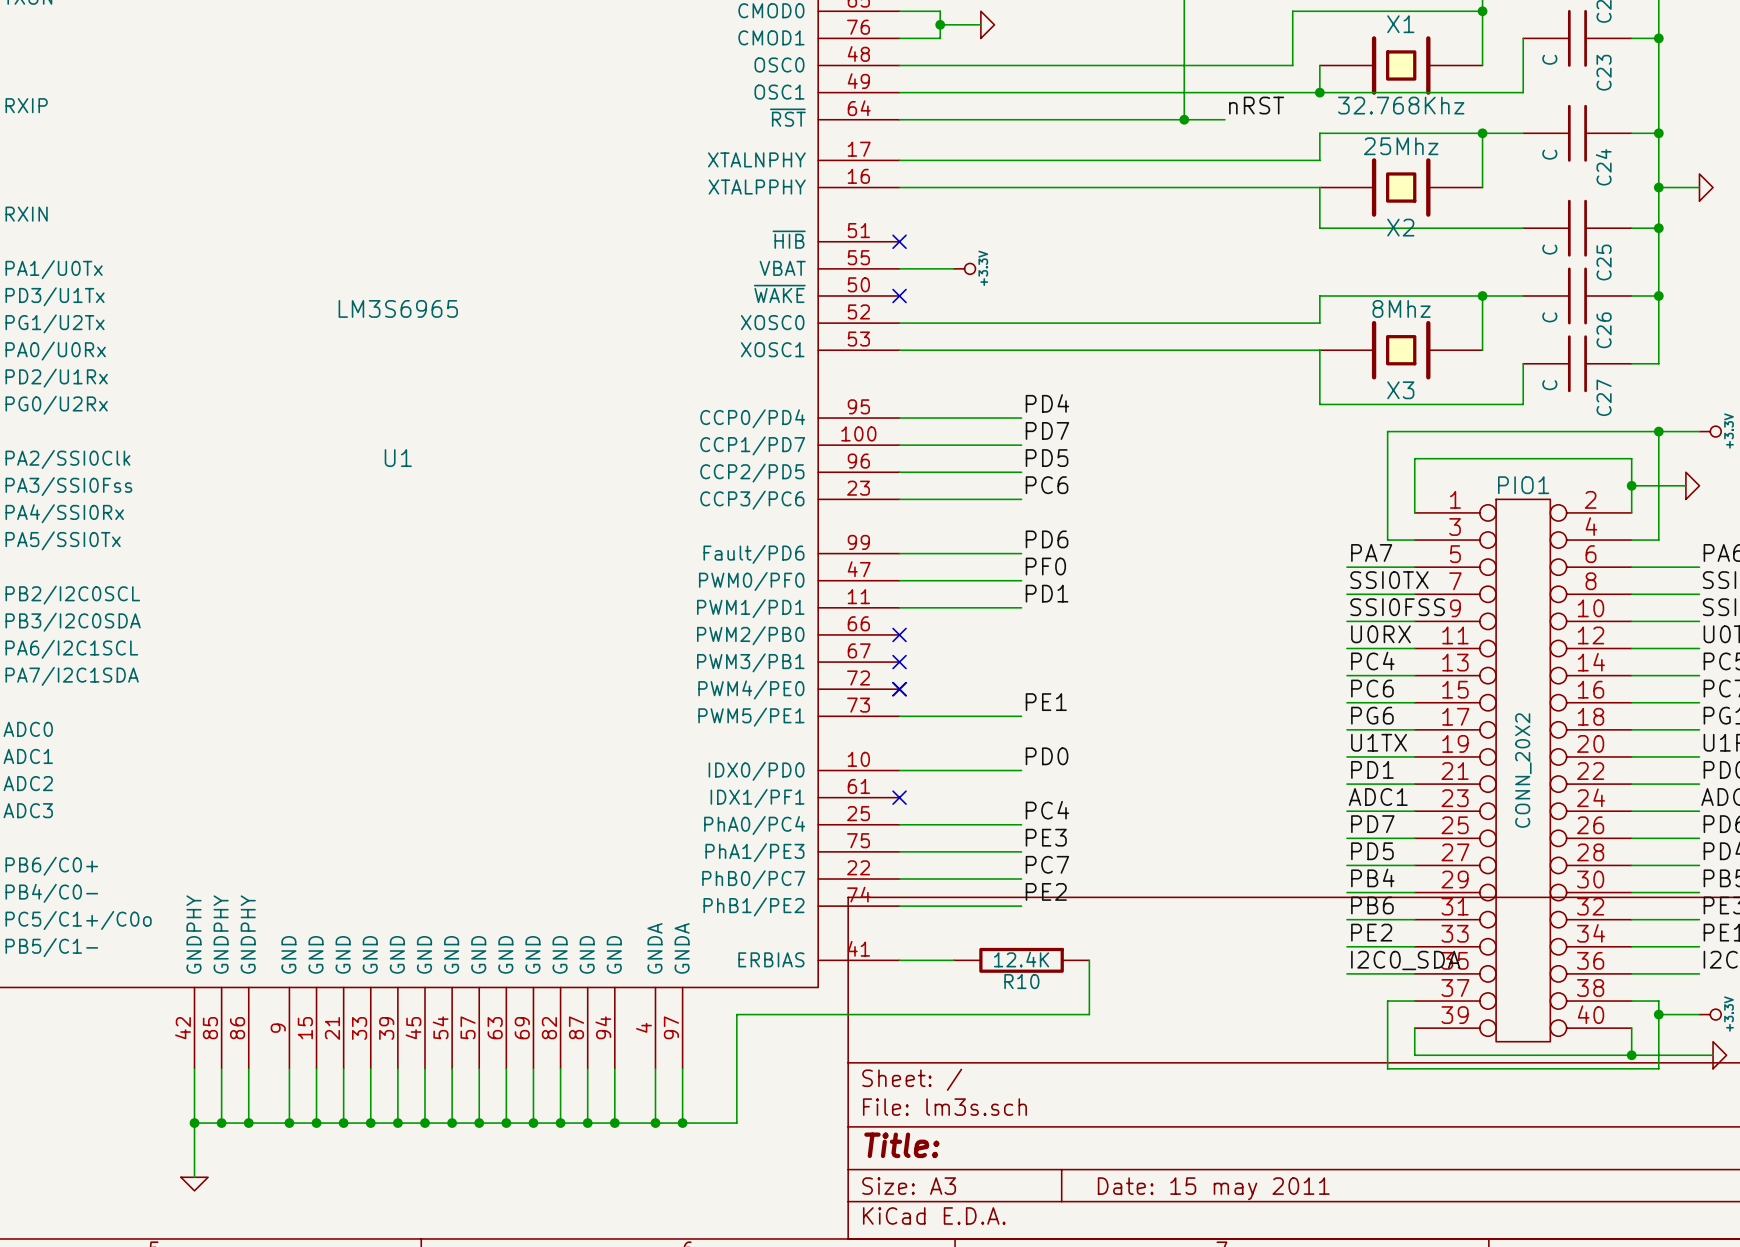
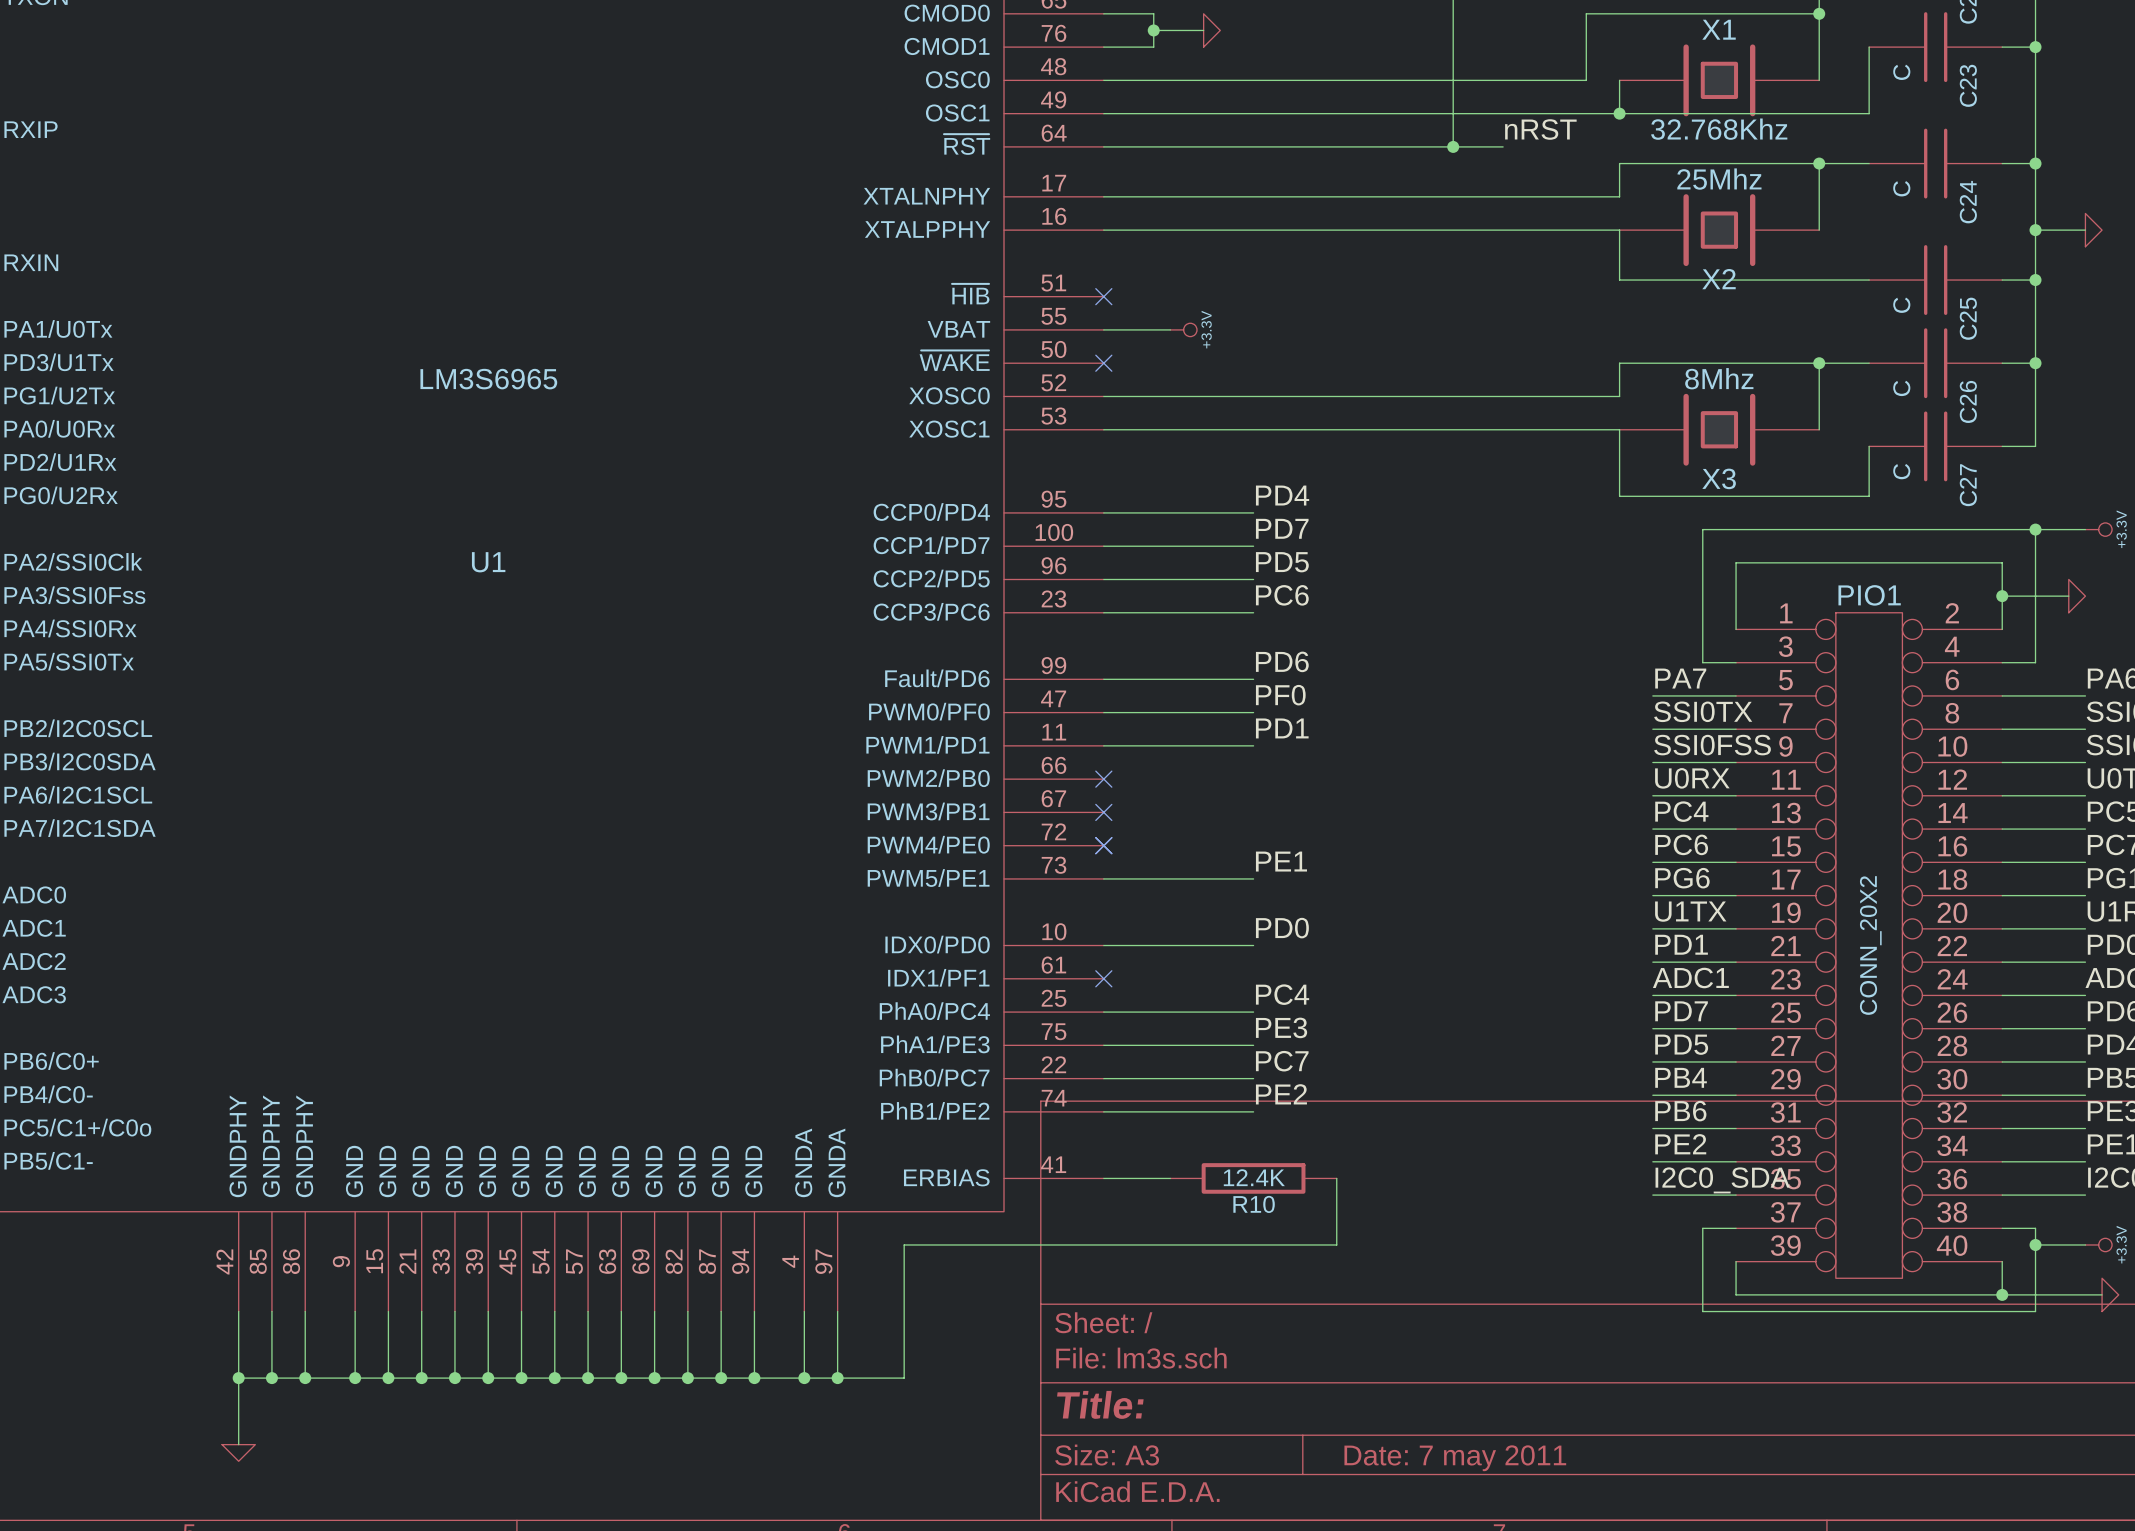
title block: Date: 15 may 2011 (1213, 1188) -> Date: 7 may 2011 (1455, 1458)

